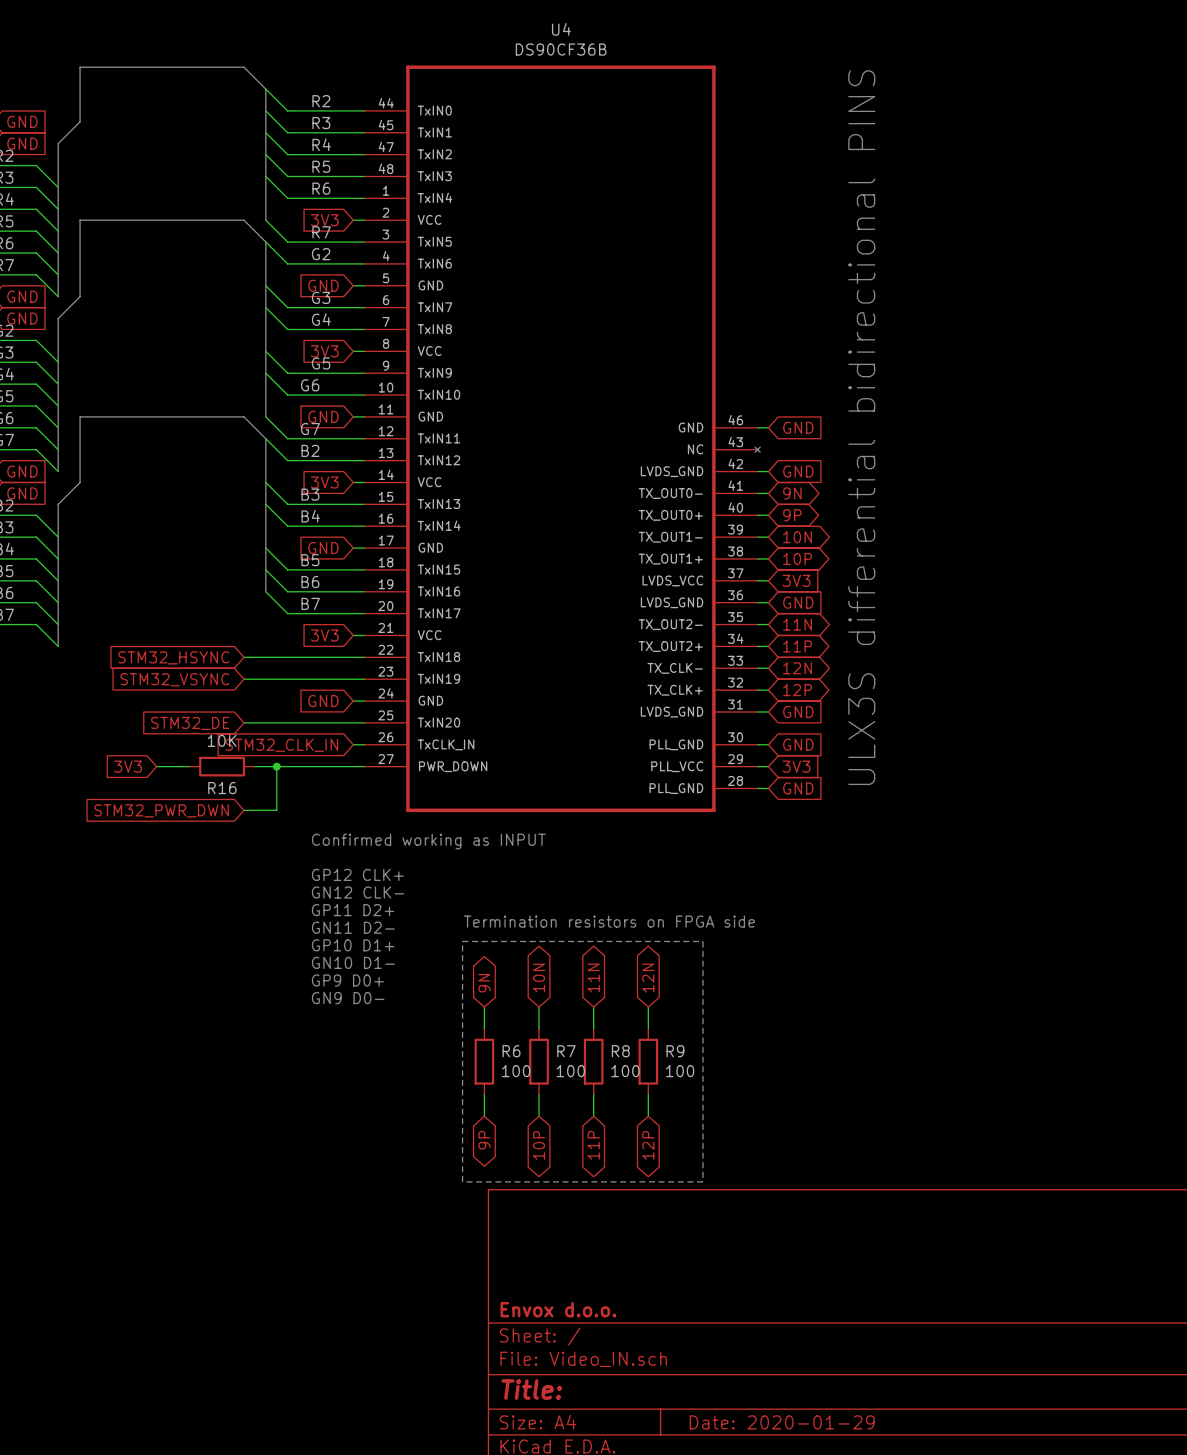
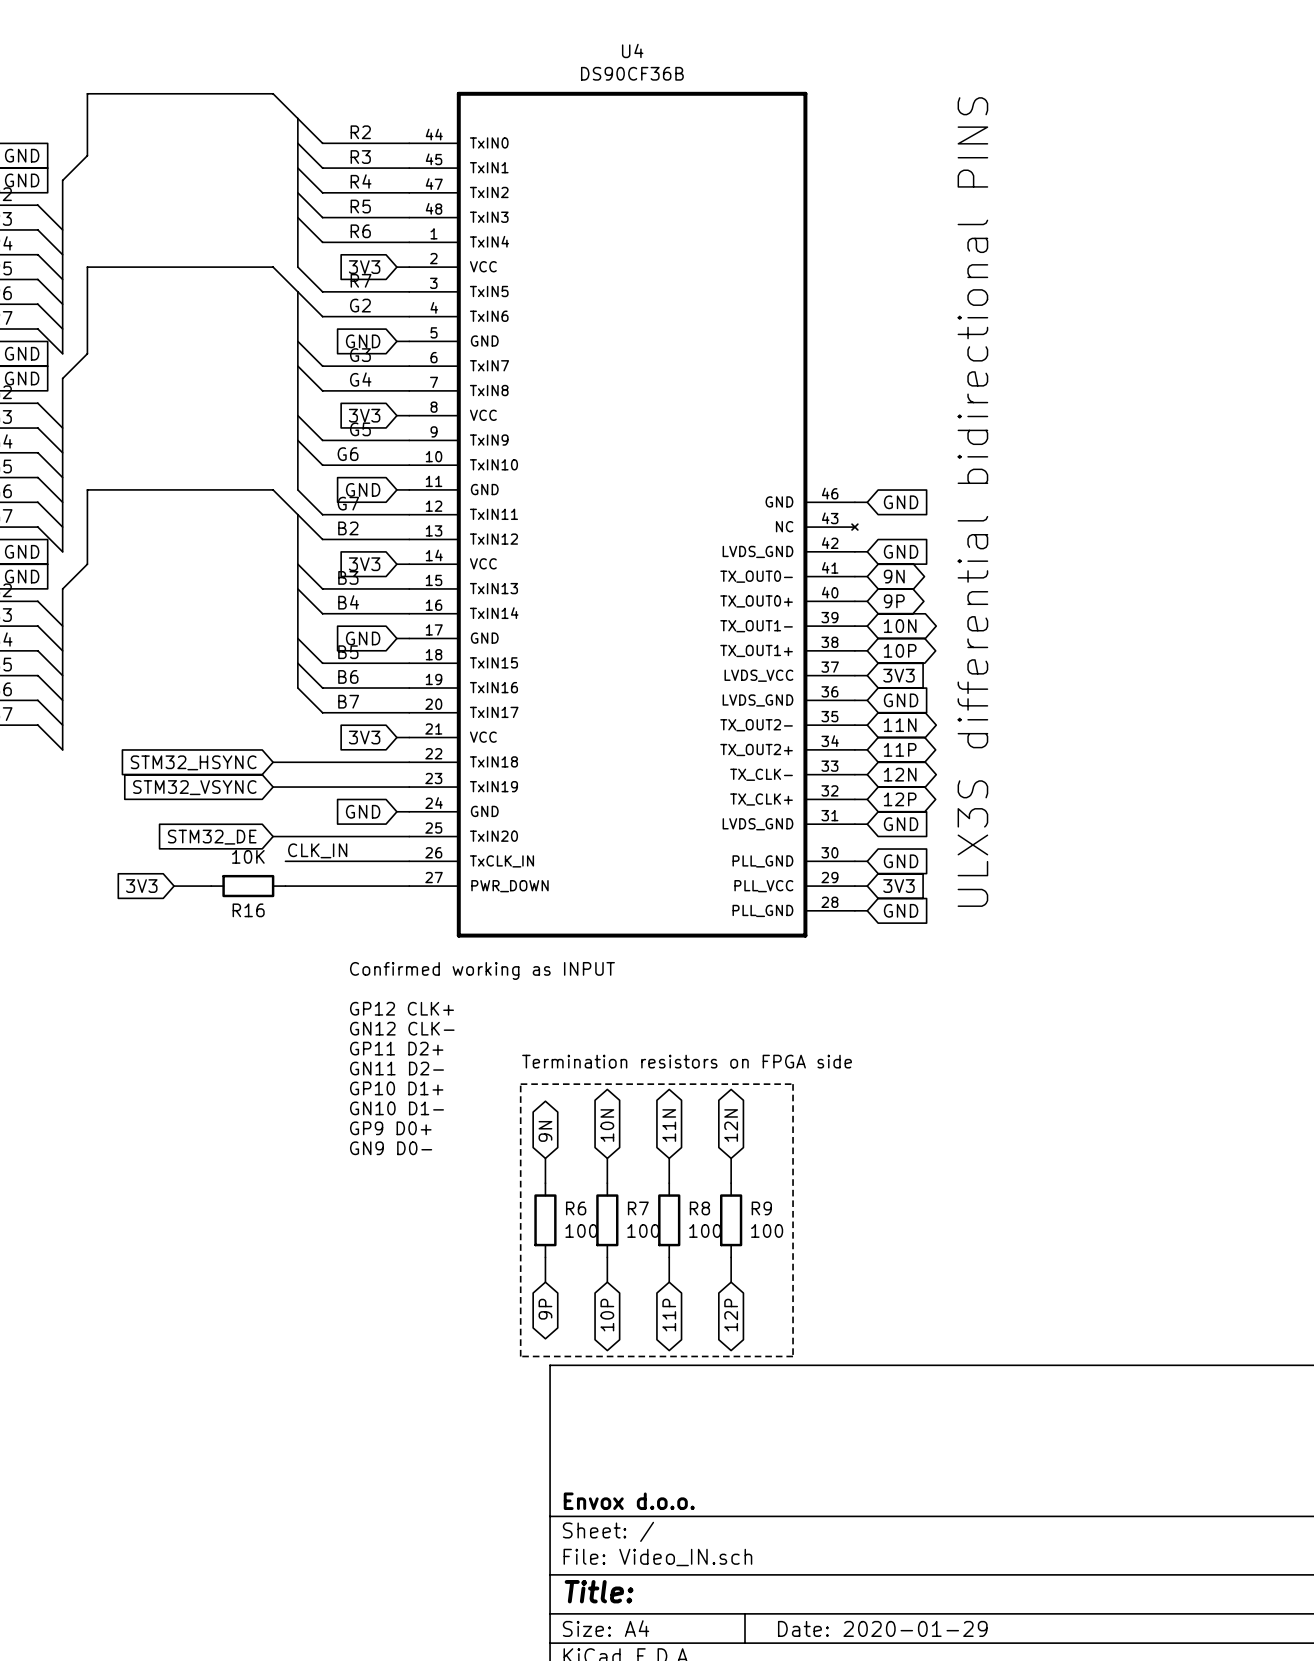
label: none -> CLK_IN (317, 850)
wire: none -> (285, 861) (396, 861)
global label: STM32_CLK_IN (281, 745) -> none
wire: (276, 766) (276, 810) (243, 810) -> none
junction: (276, 766) -> none
global label: STM32_PWR_DWN (161, 810) -> none

